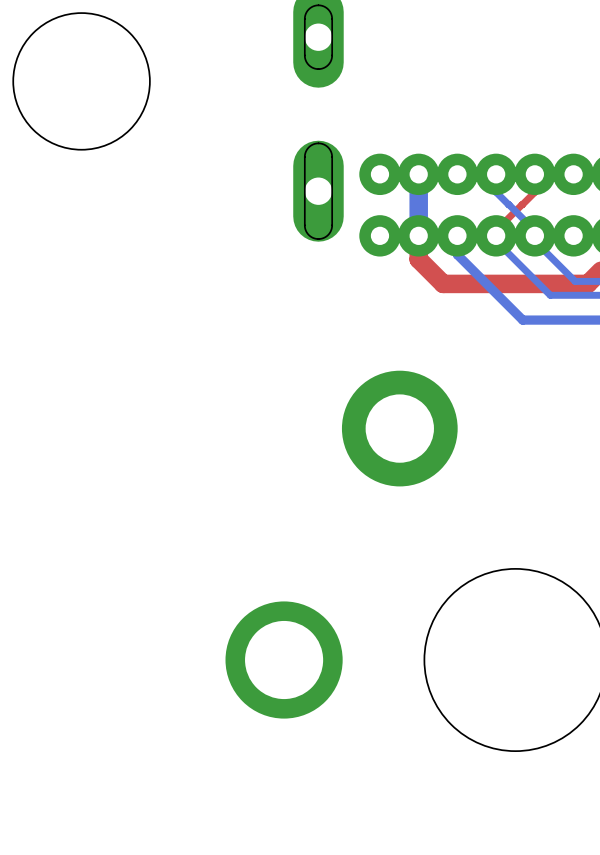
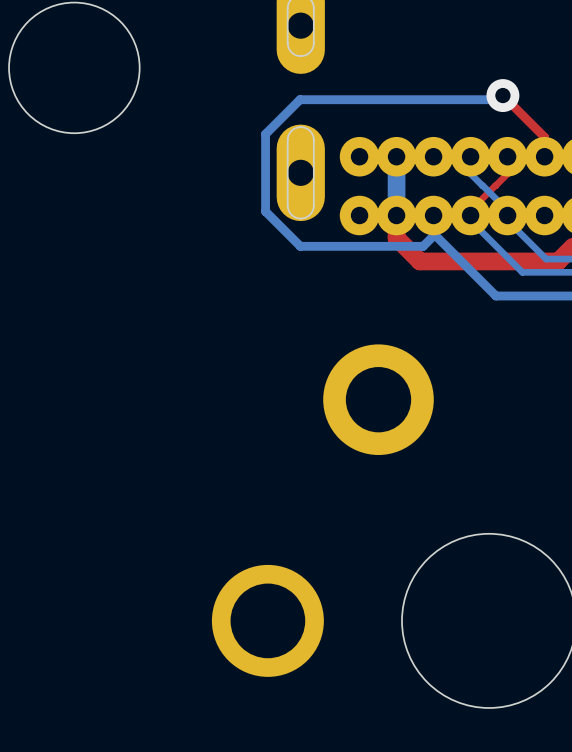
bottom track: none -> (502, 95) (502, 99) (300, 99) (265, 134) (265, 211) (300, 246) (423, 246) (433, 233)
top track: none -> (502, 95) (544, 137) (544, 156)
via: none -> (502, 95)

